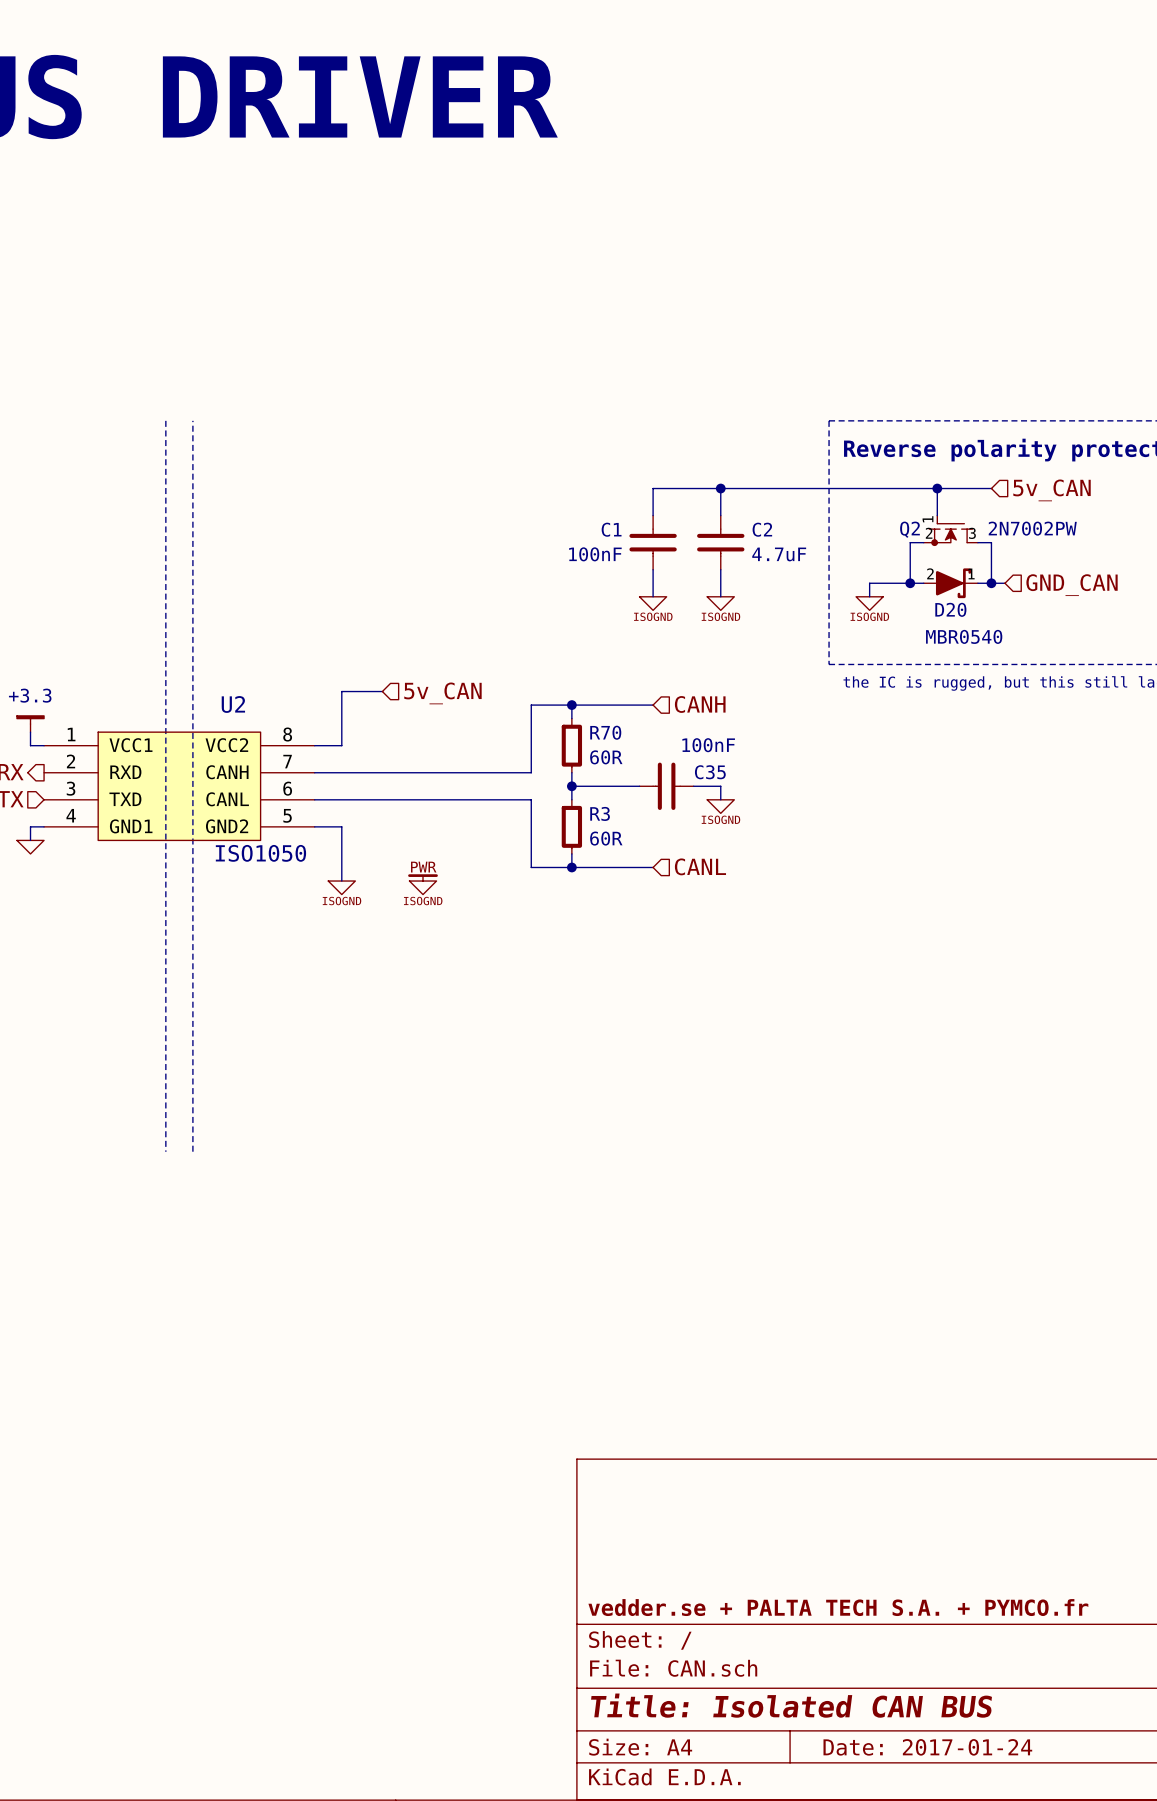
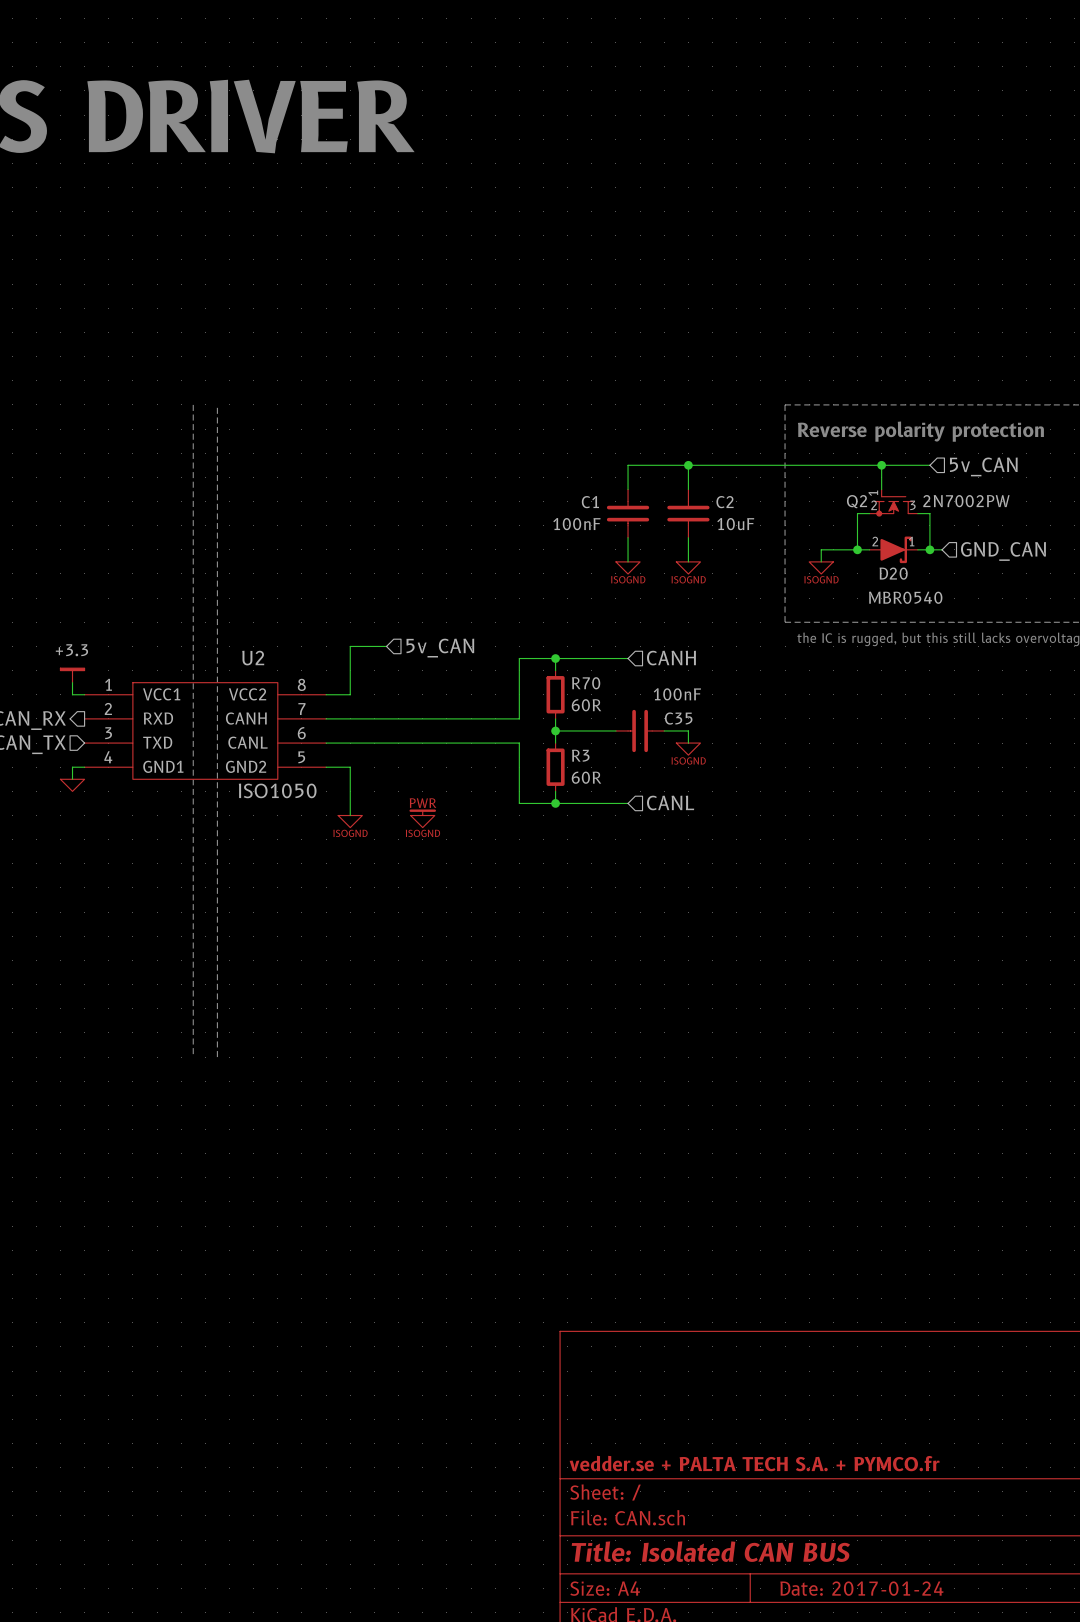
C2 value: 4.7uF (779, 554) -> 10uF (735, 524)

